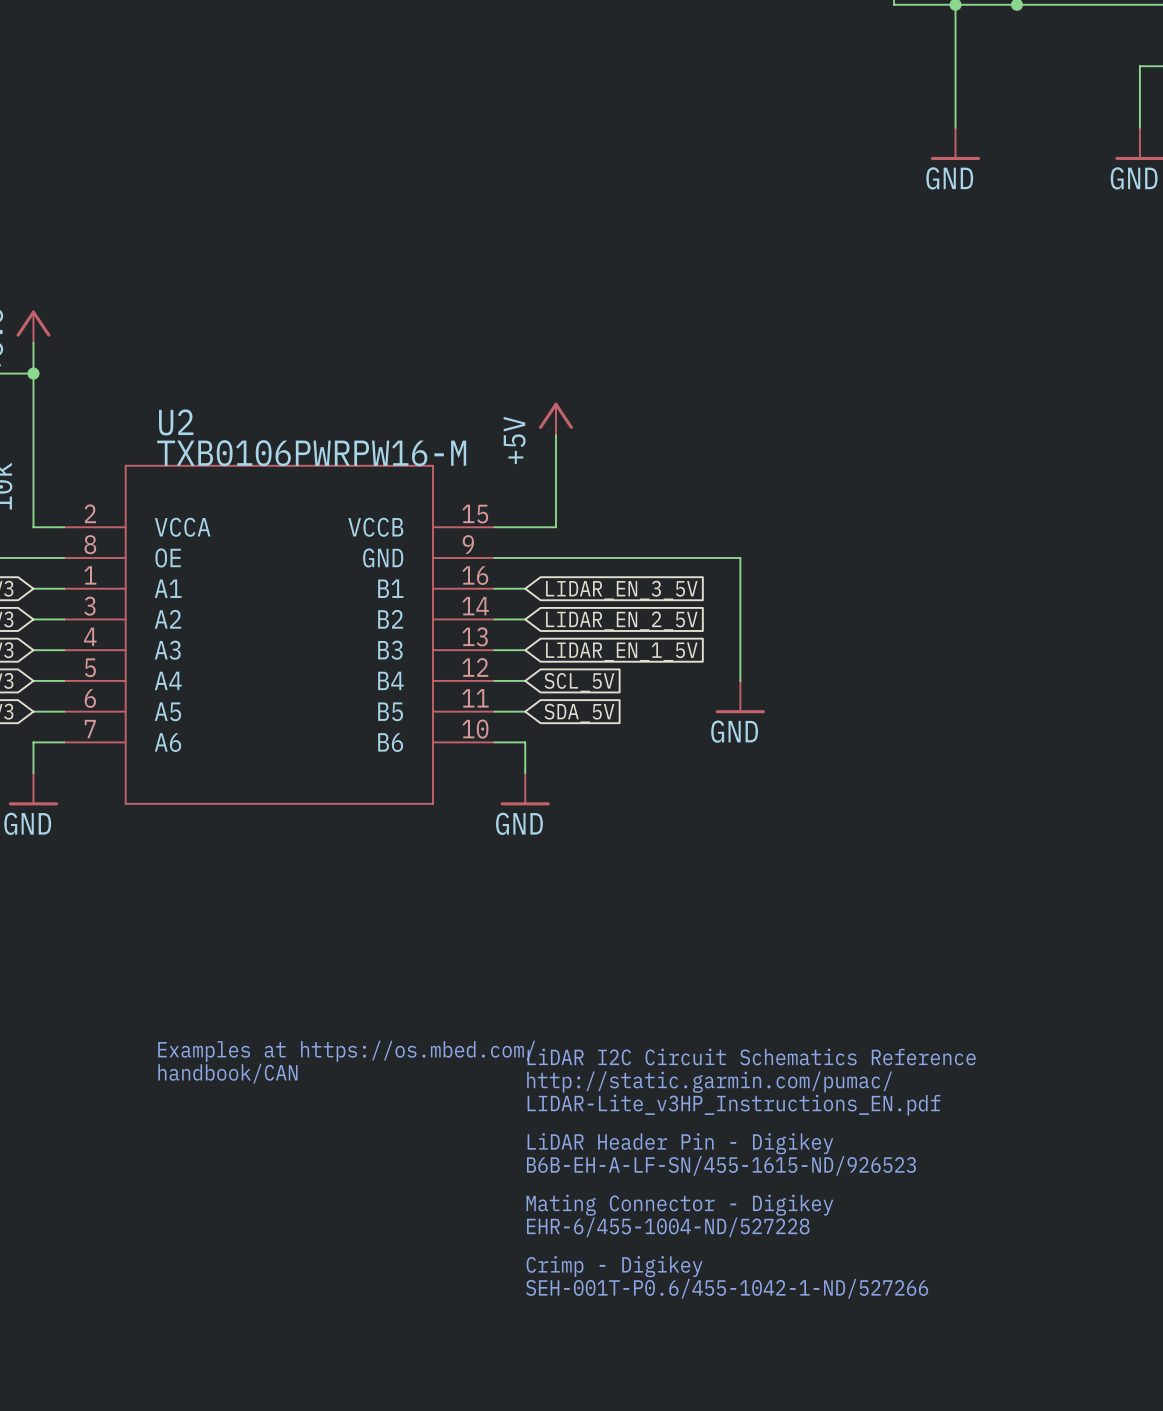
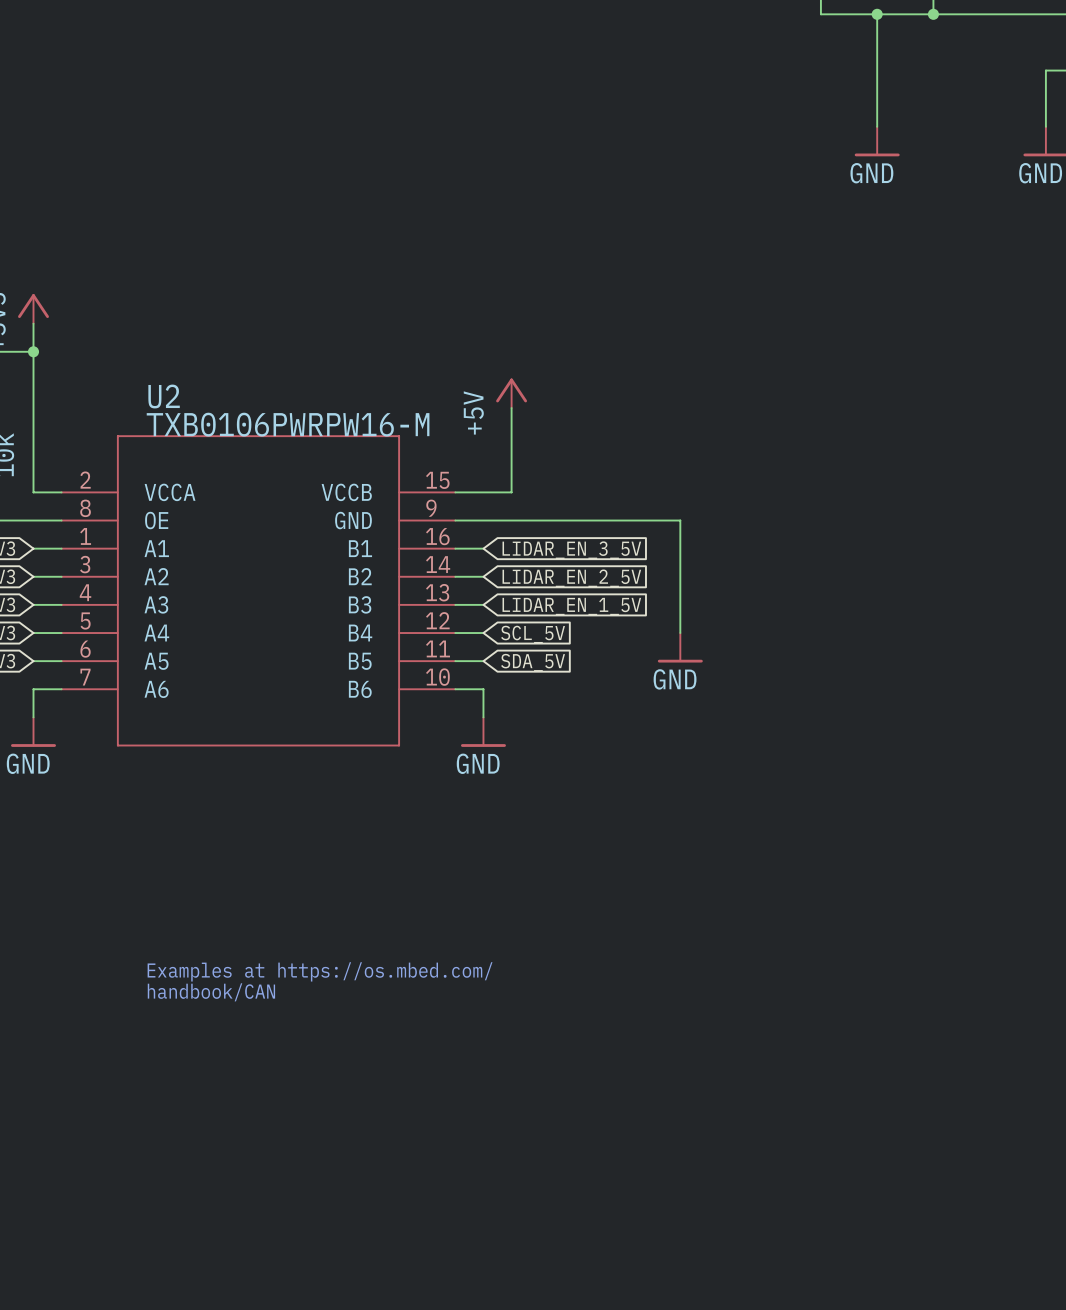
text: LiDAR I2C Circuit Schematics Reference (751, 1057) -> none
text: http://static.garmin.com/pumac/ (709, 1082) -> none
text: LIDAR-Lite_v3HP_Instructions_EN.pdf (733, 1105) -> none
text: LiDAR Header Pin - Digikey (680, 1143) -> none
text: B6B-EH-A-LF-SN/455-1615-ND/926523 (721, 1165) -> none
text: Mating Connector - Digikey (679, 1205) -> none
text: EHR-6/455-1004-ND/527228 (668, 1227) -> none
text: Crimp - Digikey (614, 1266) -> none
text: SEH-001T-P0.6/455-1042-1-ND/527266 (727, 1288) -> none

